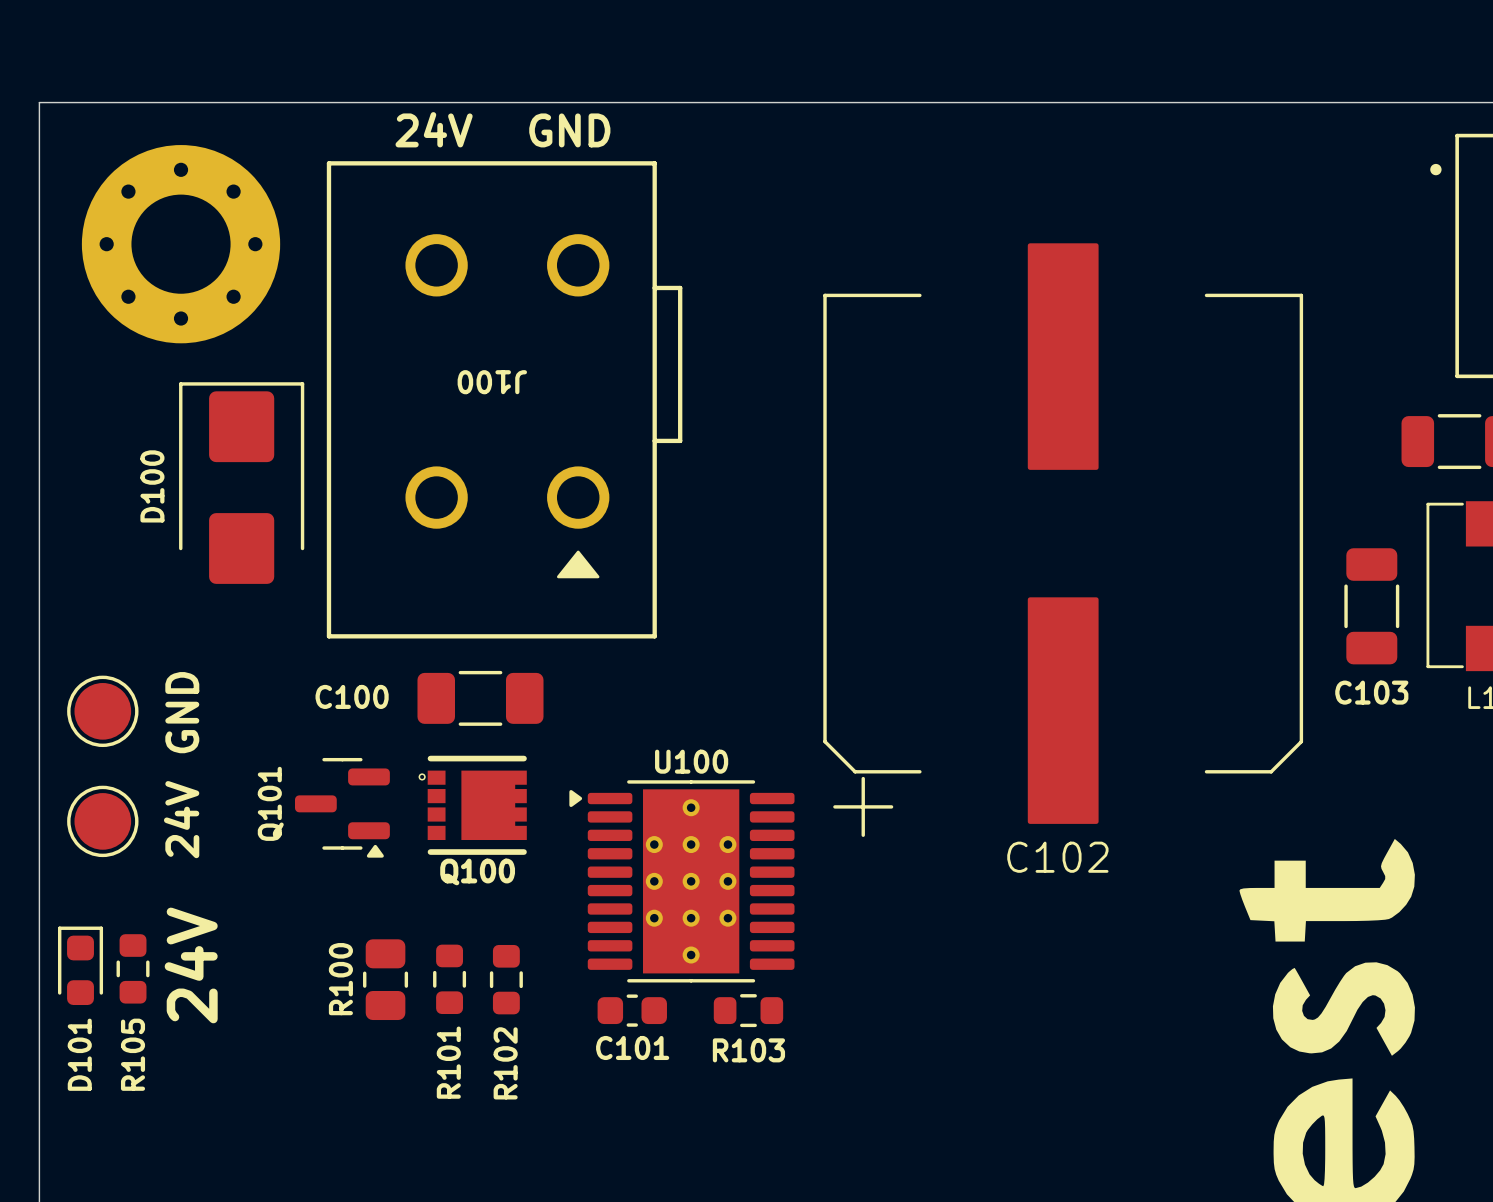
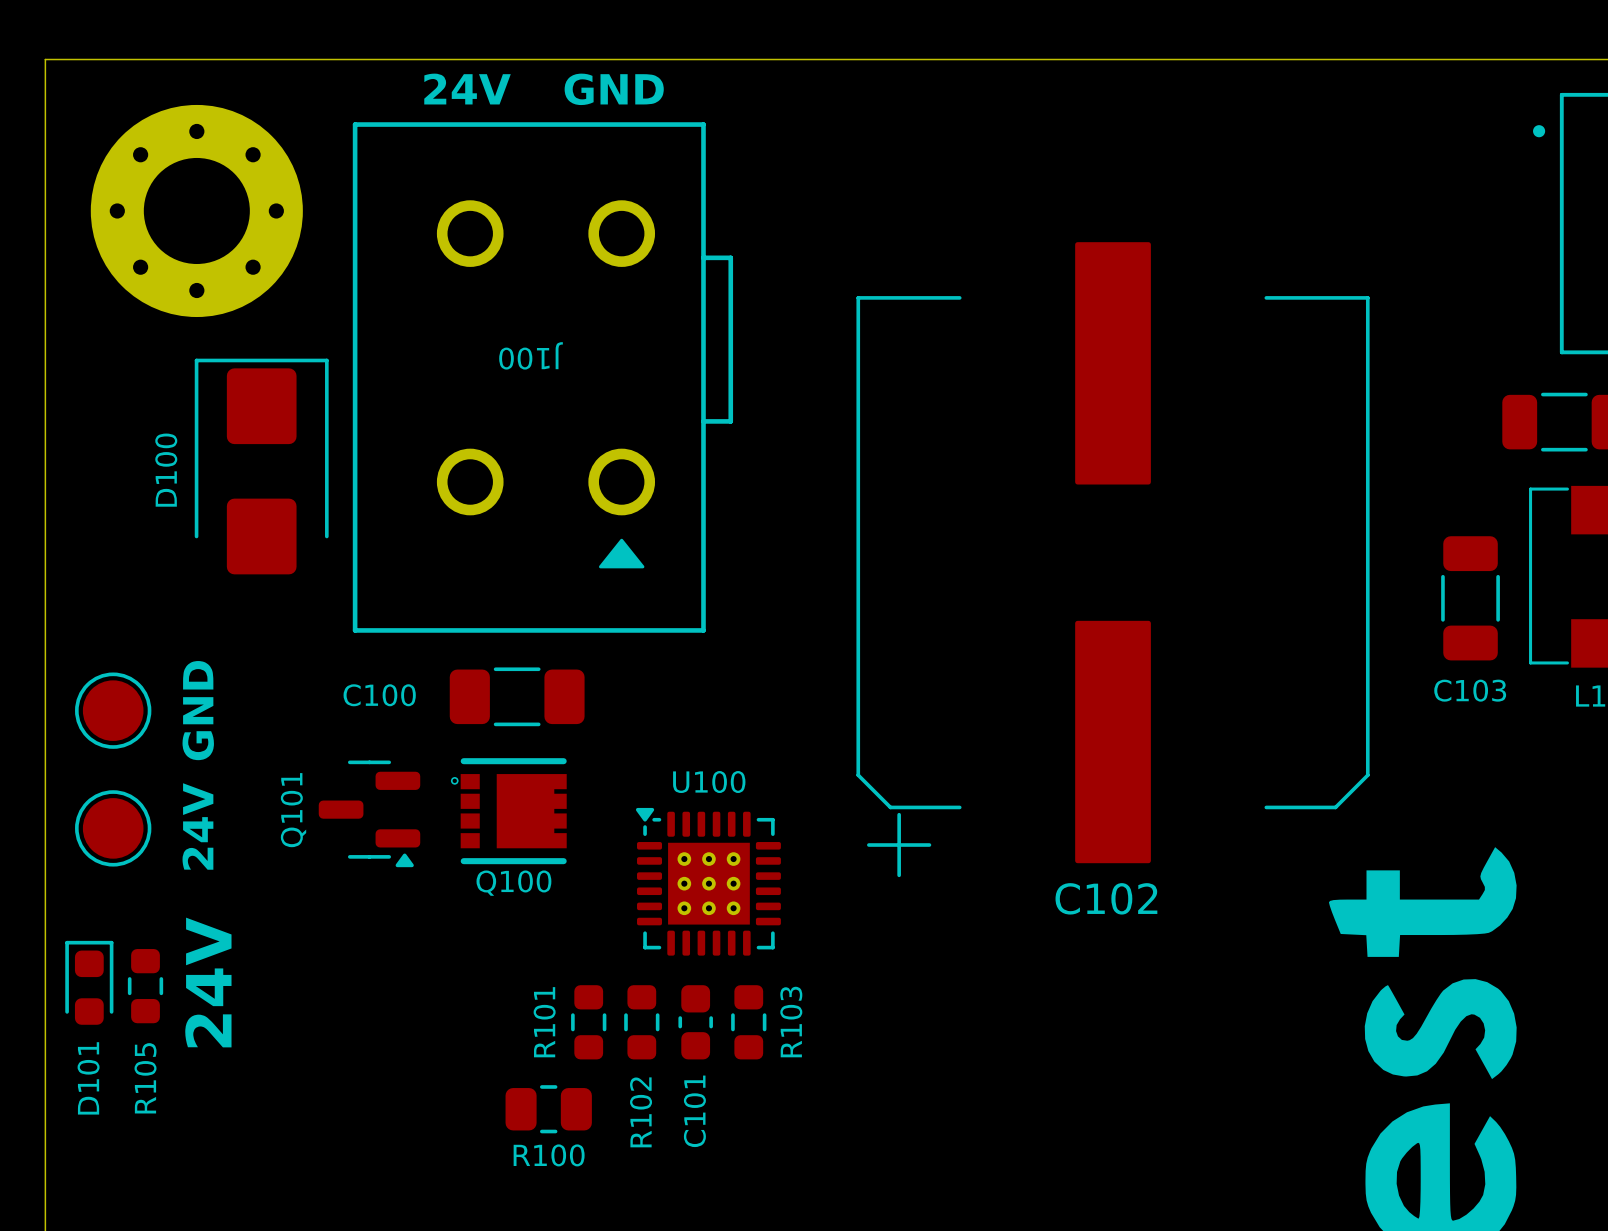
C102 position: (1063, 540) -> (1113, 559)
U100 footprint: [569, 780, 795, 983] -> [635, 807, 781, 956]
R100 name position: R100 (340, 979) -> R100 (549, 1155)
R100 rotation: 0° (385, 979) -> 90° clockwise (548, 1109)
R100 position: (385, 979) -> (548, 1109)
R101 position: (449, 979) -> (588, 1022)
R102 position: (506, 979) -> (641, 1022)
C101 rotation: 0° (632, 1010) -> 90° clockwise (695, 1022)
R103 rotation: 0° (748, 1010) -> 90° clockwise (748, 1022)
R103 position: (748, 1010) -> (748, 1022)
R103 name position: R103 (748, 1050) -> R103 (791, 1022)
R101 name position: R101 (448, 1062) -> R101 (544, 1022)

